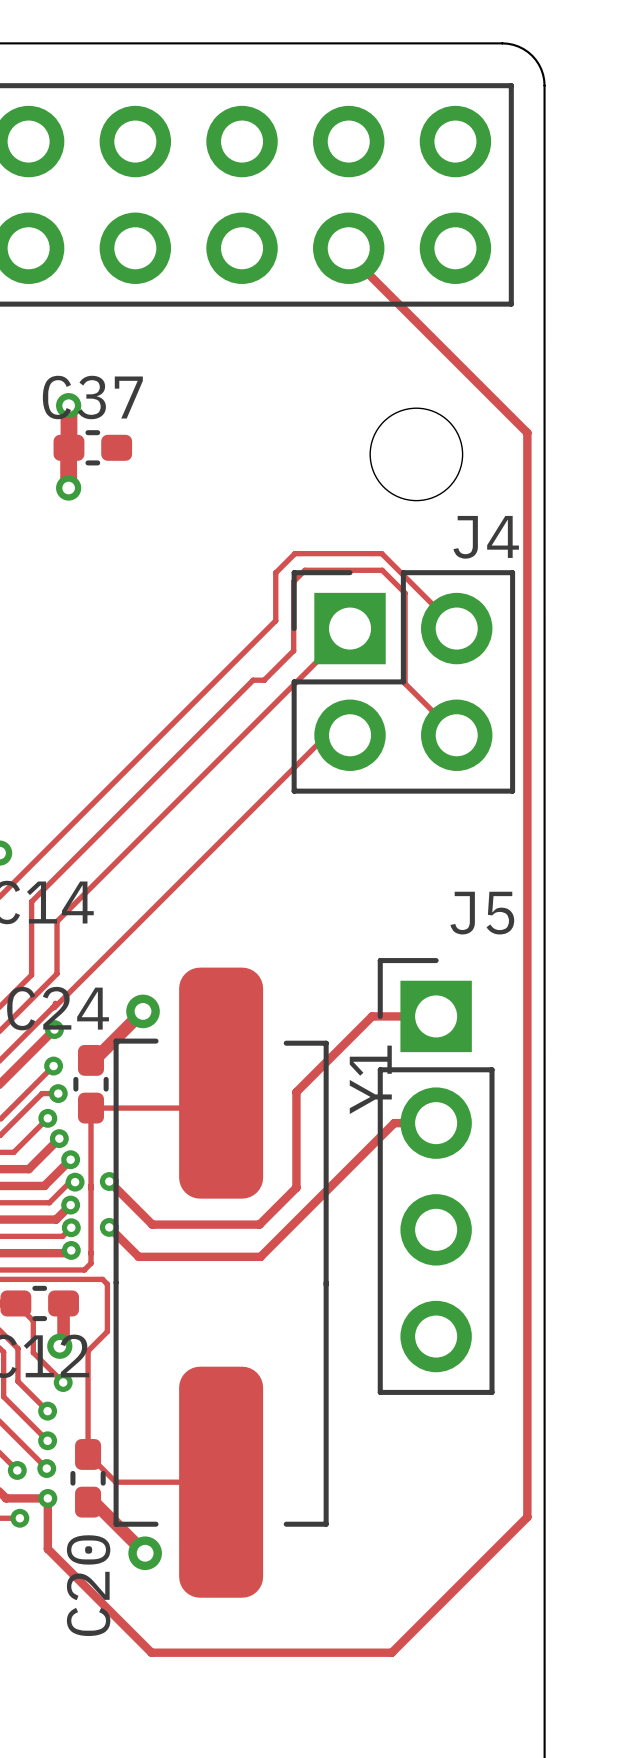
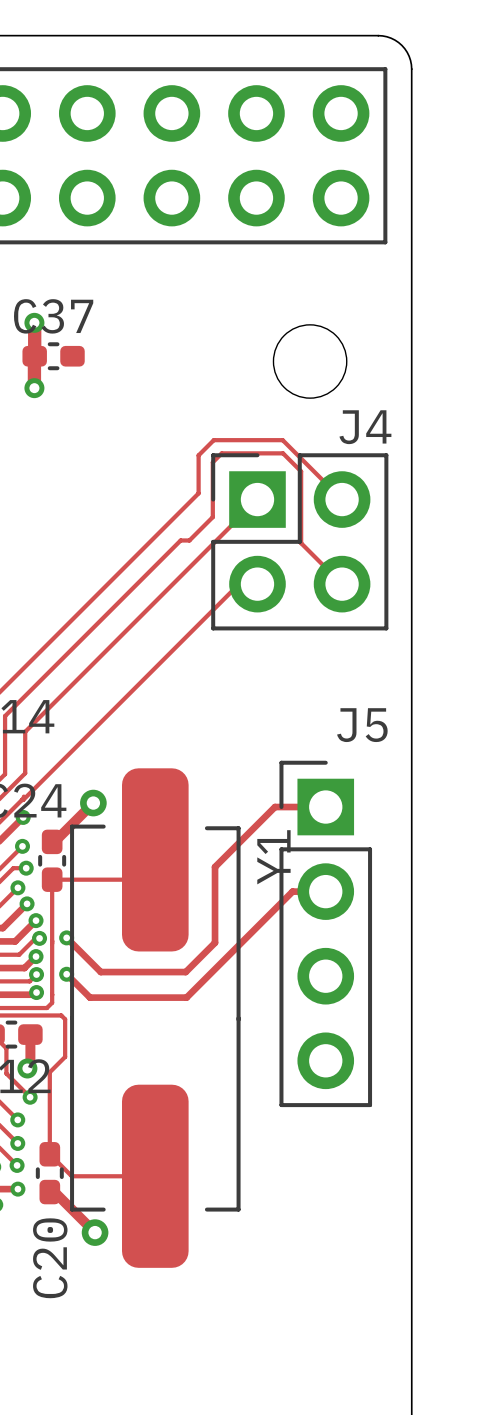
track: (348, 248) (348, 254) (527, 432) (527, 1517) (391, 1652) (151, 1652) (47, 1548) (47, 1498) -> none

